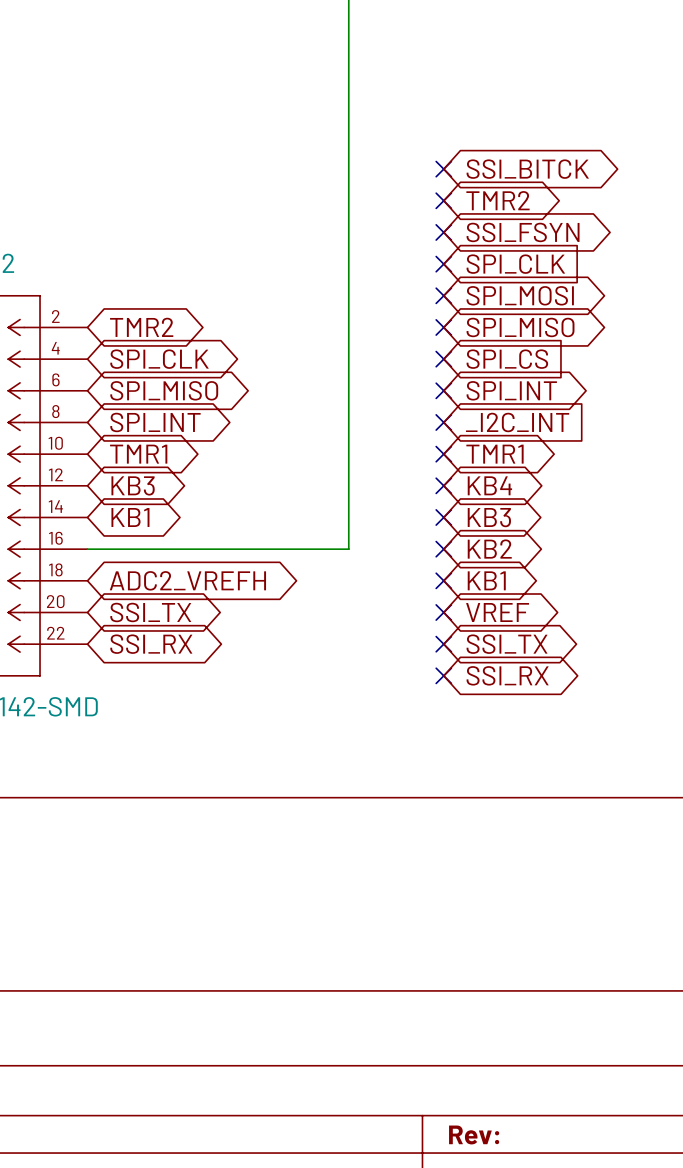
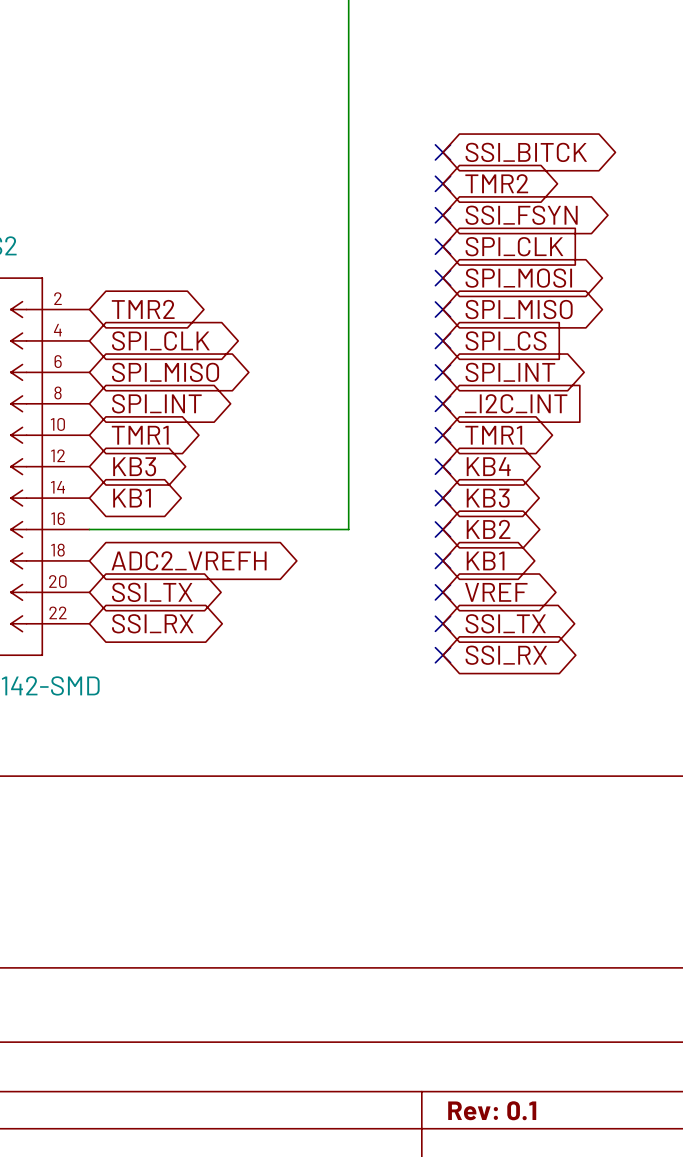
title block: Rev: (474, 1134) -> Rev: 0.1 (492, 1110)

